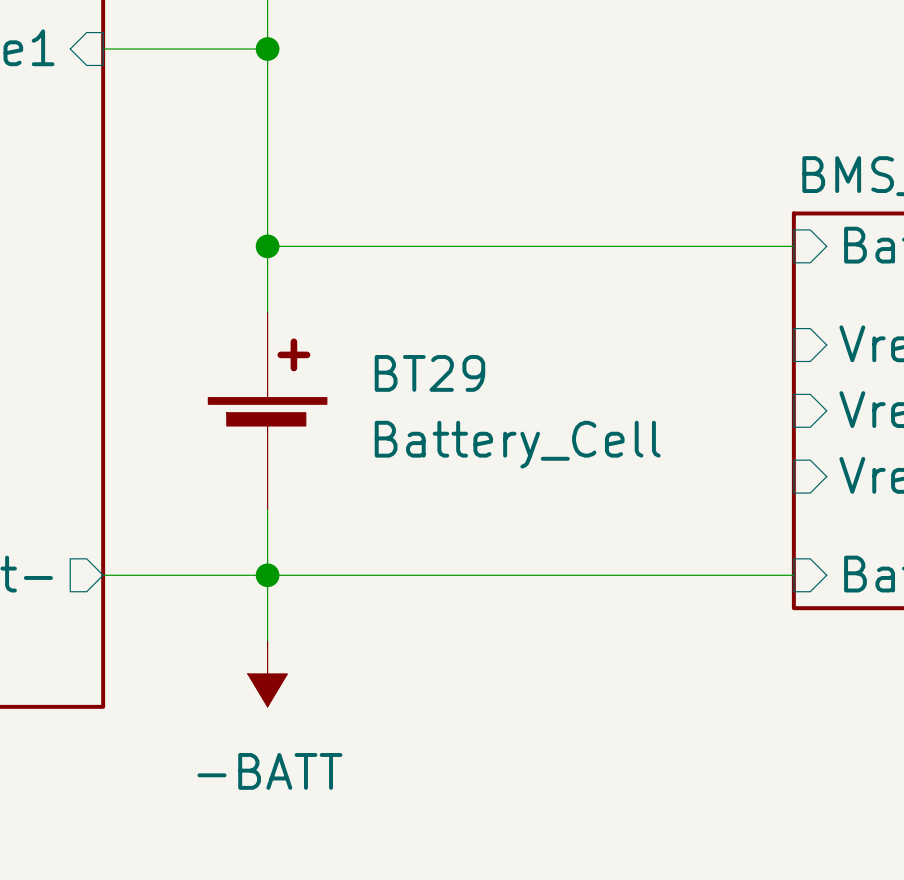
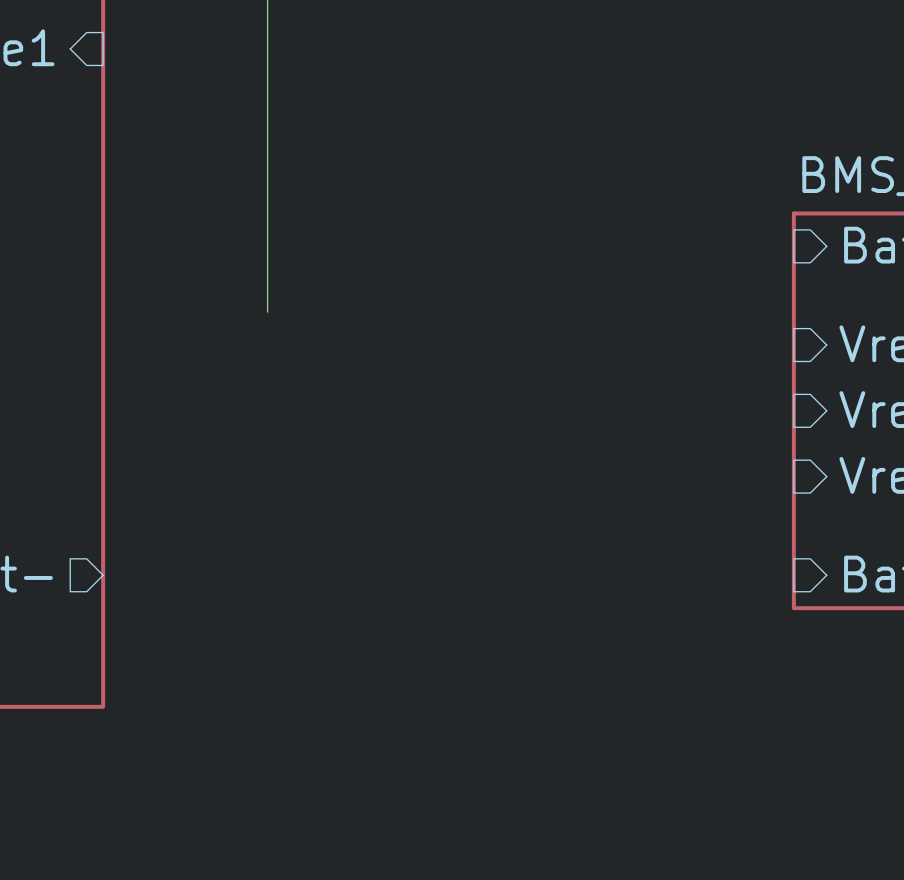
wire: (103, 49) (267, 49) -> none
junction: (267, 49) -> none
wire: (267, 246) (793, 246) -> none
junction: (267, 246) -> none
BT29: Battery_Cell (267, 410) -> none
wire: (267, 509) (267, 641) -> none
wire: (103, 575) (793, 575) -> none
junction: (267, 575) -> none
power symbol: -BATT (267, 673) -> none

